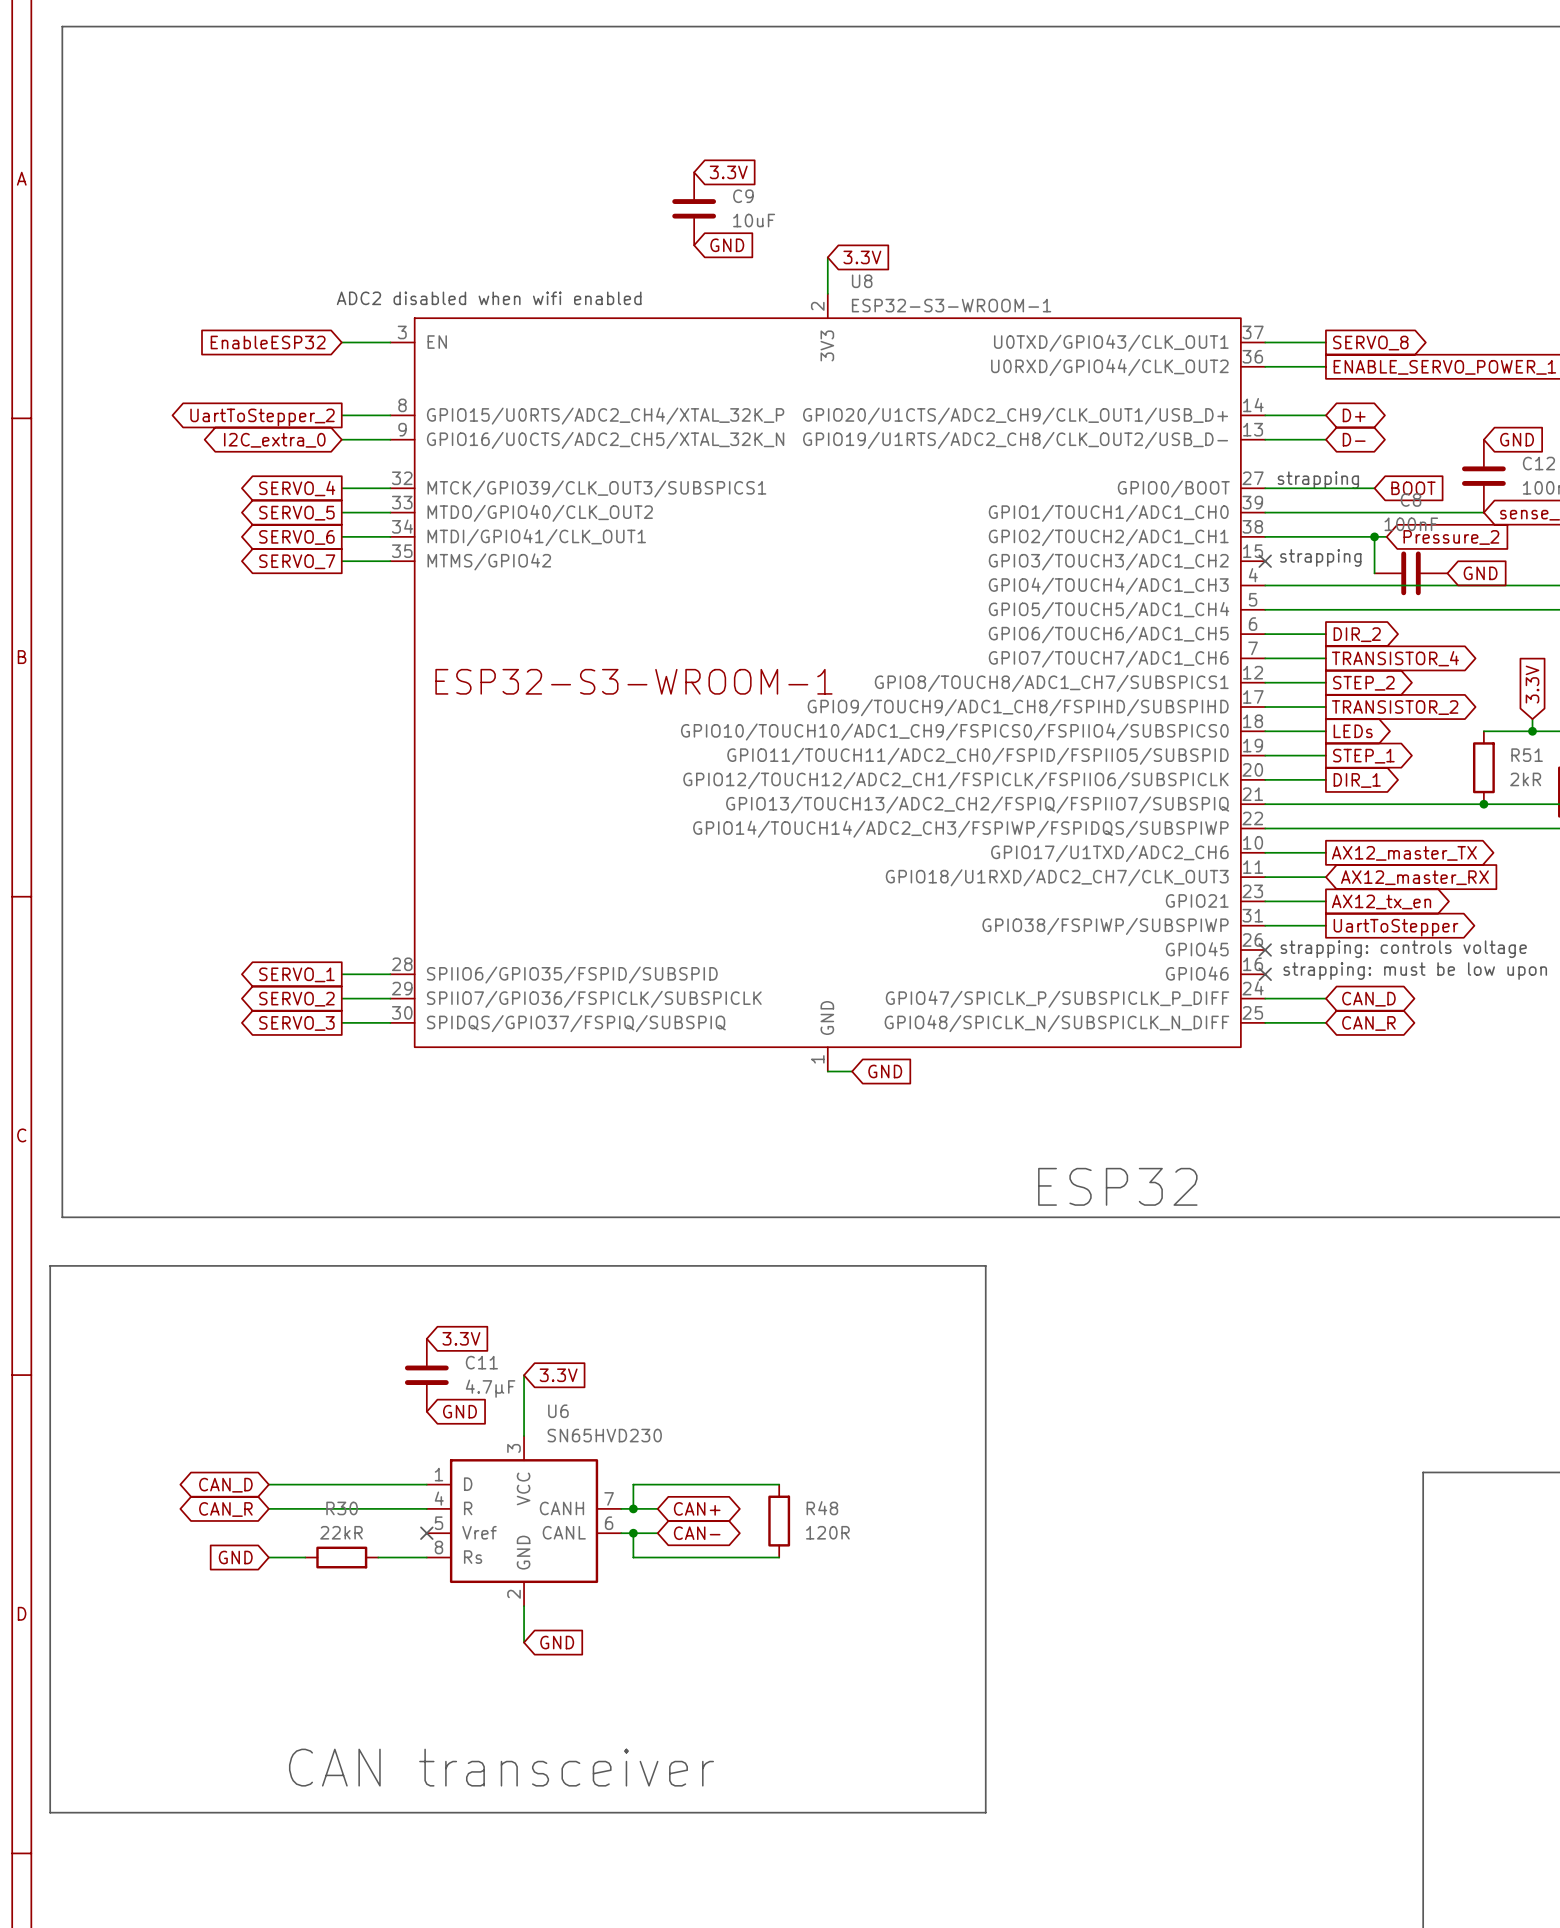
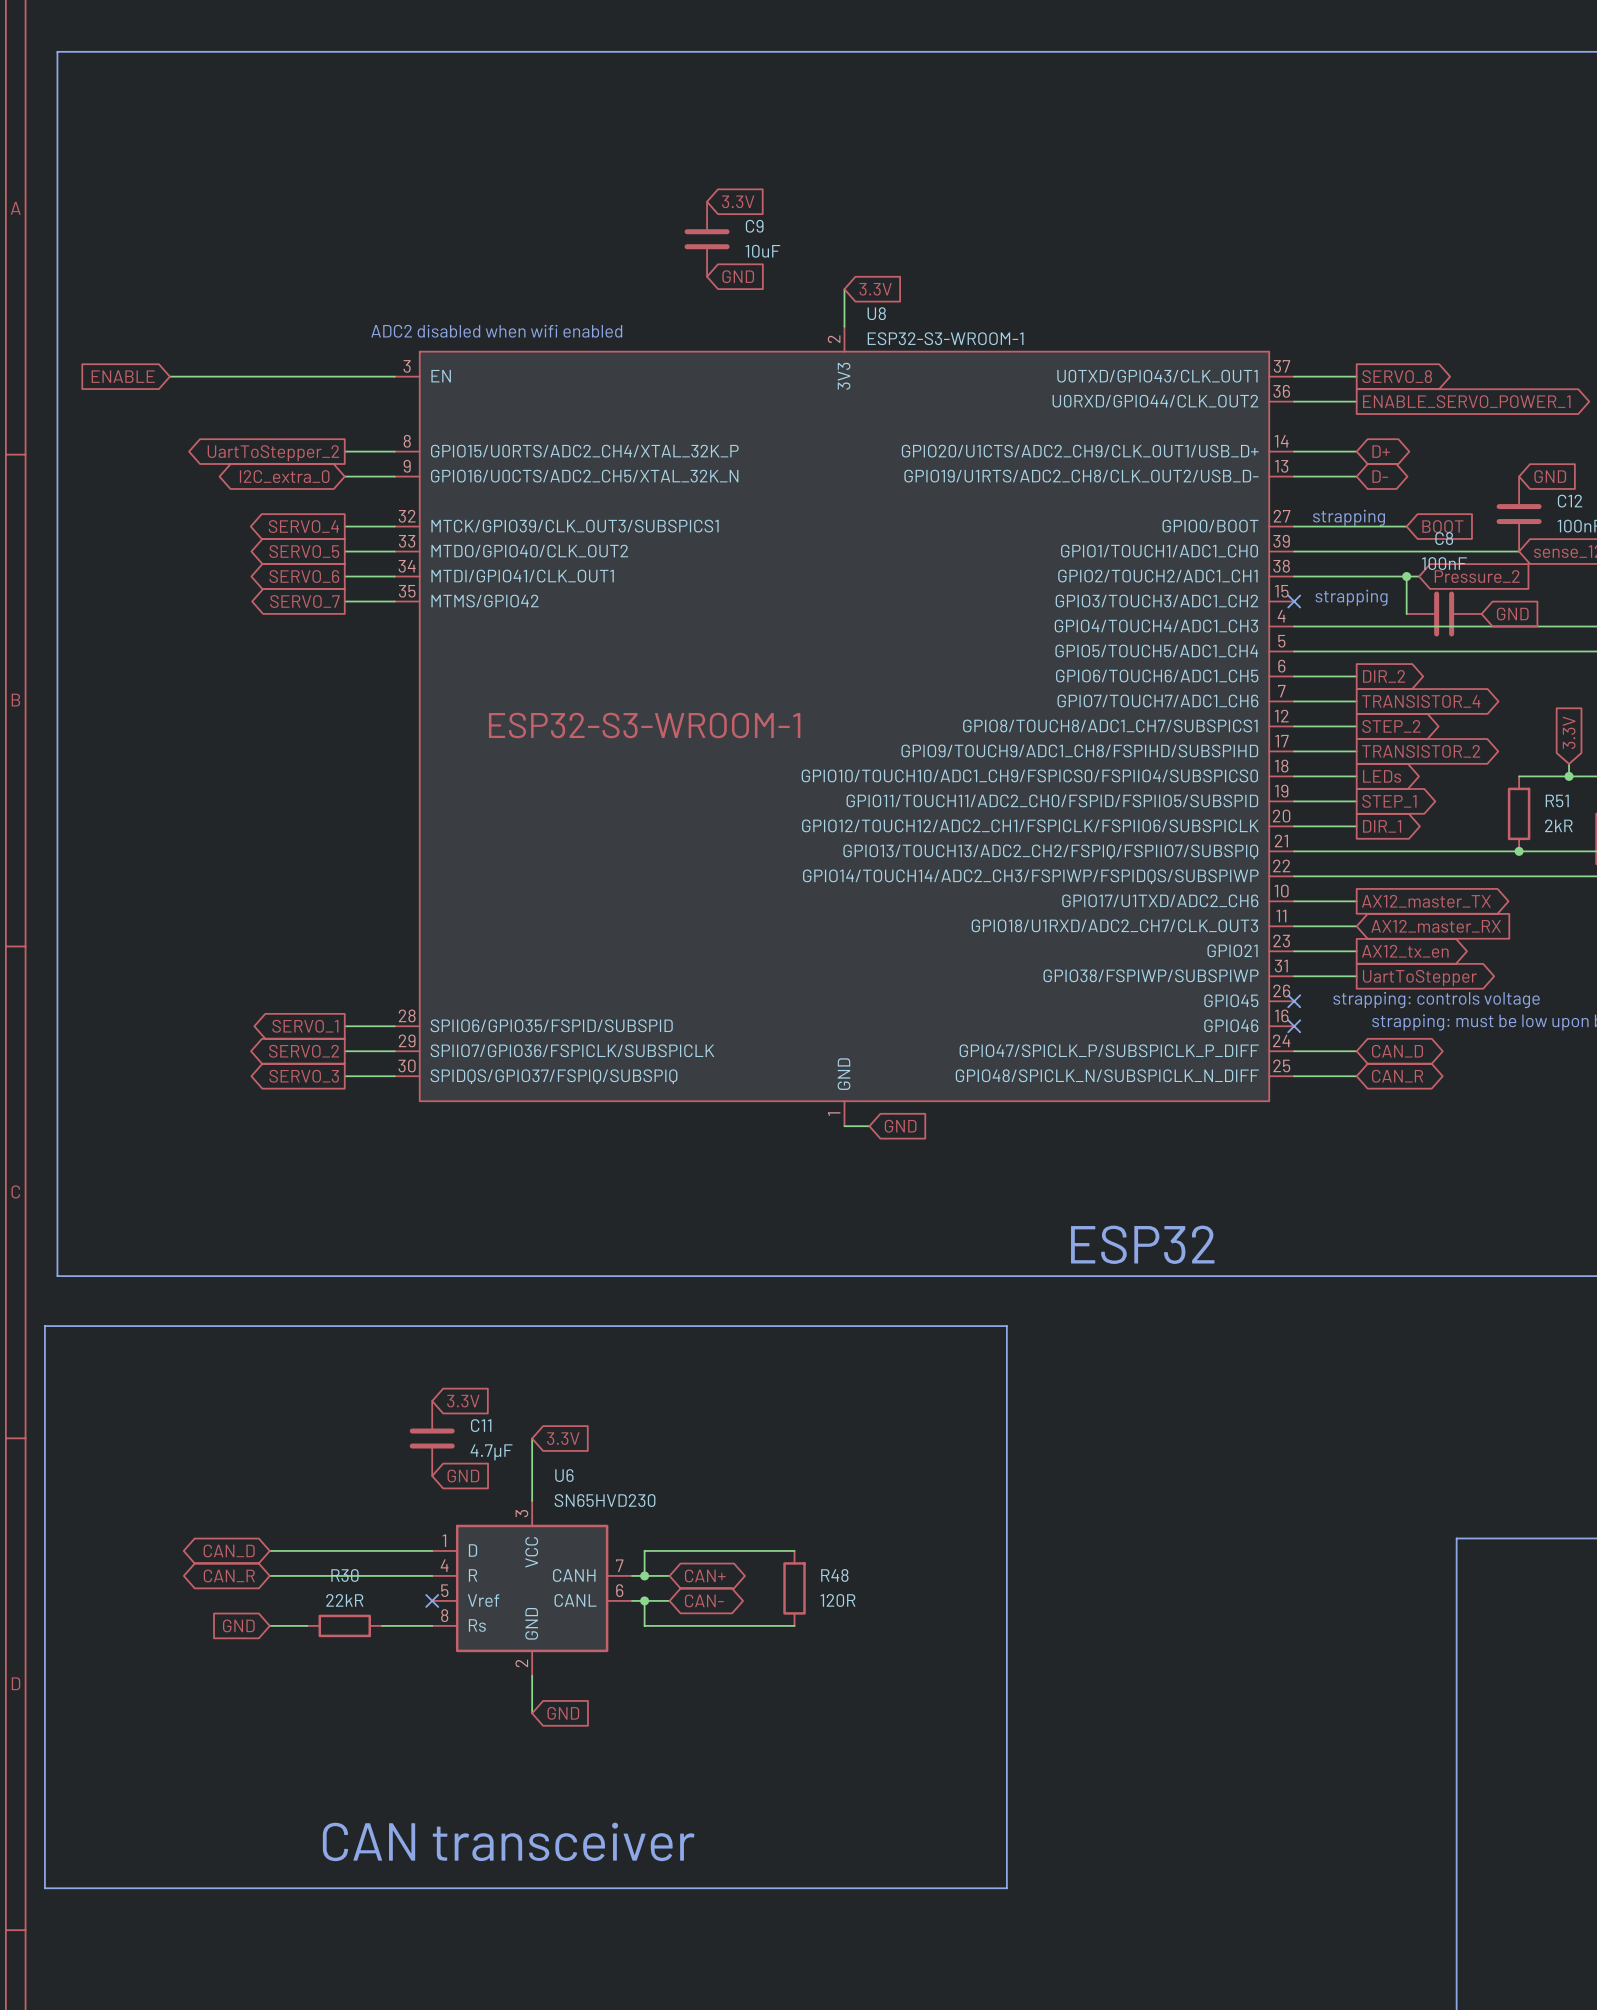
global label: none -> ENABLE (123, 376)
wire: none -> (169, 376) (344, 376)
global label: EnableESP32 (268, 342) -> none

